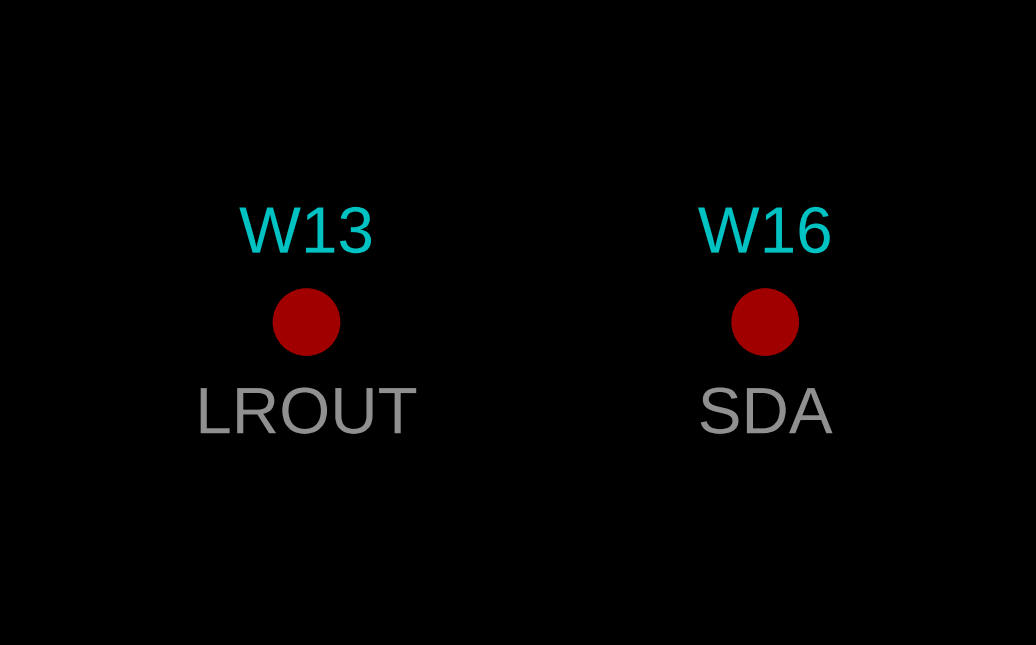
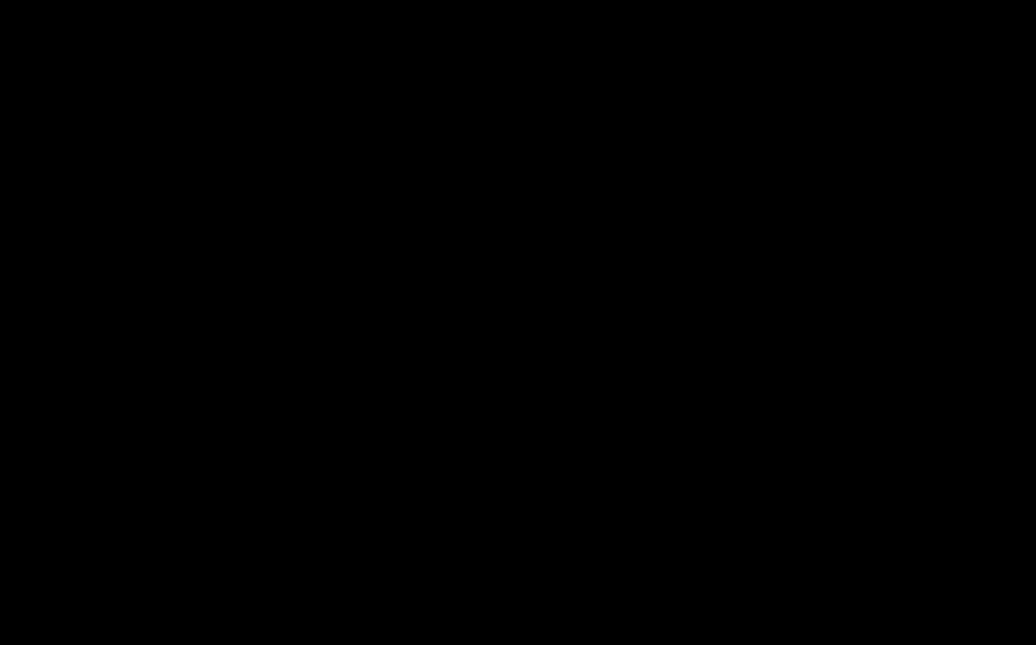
W13: LROUT (306, 322) -> none
W16: SDA (765, 322) -> none

